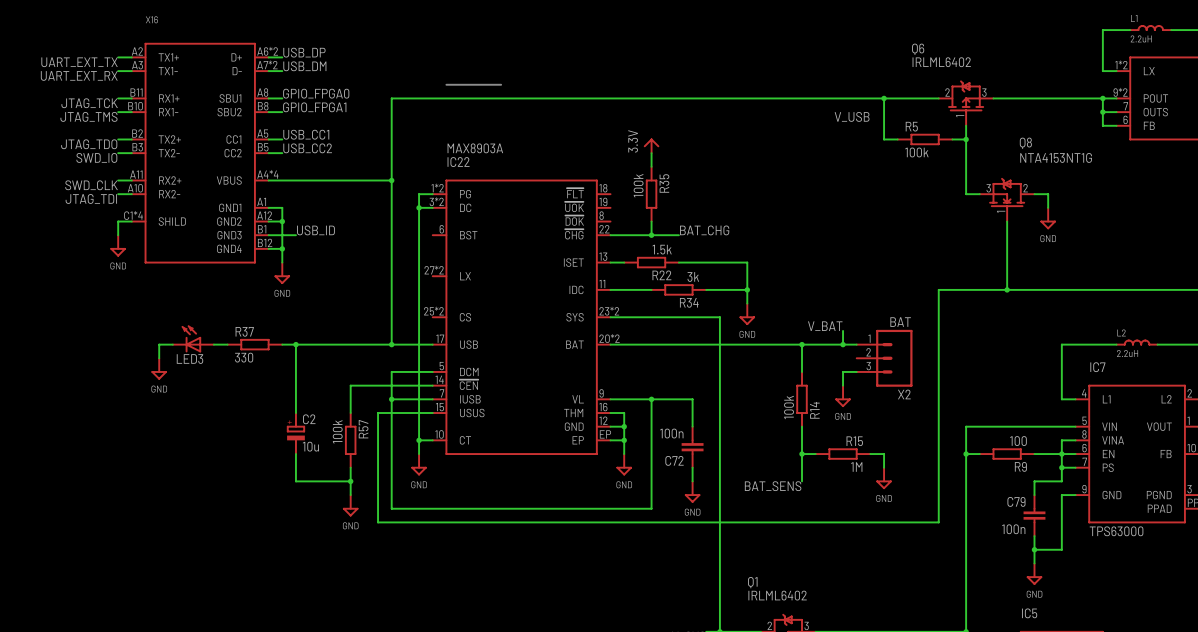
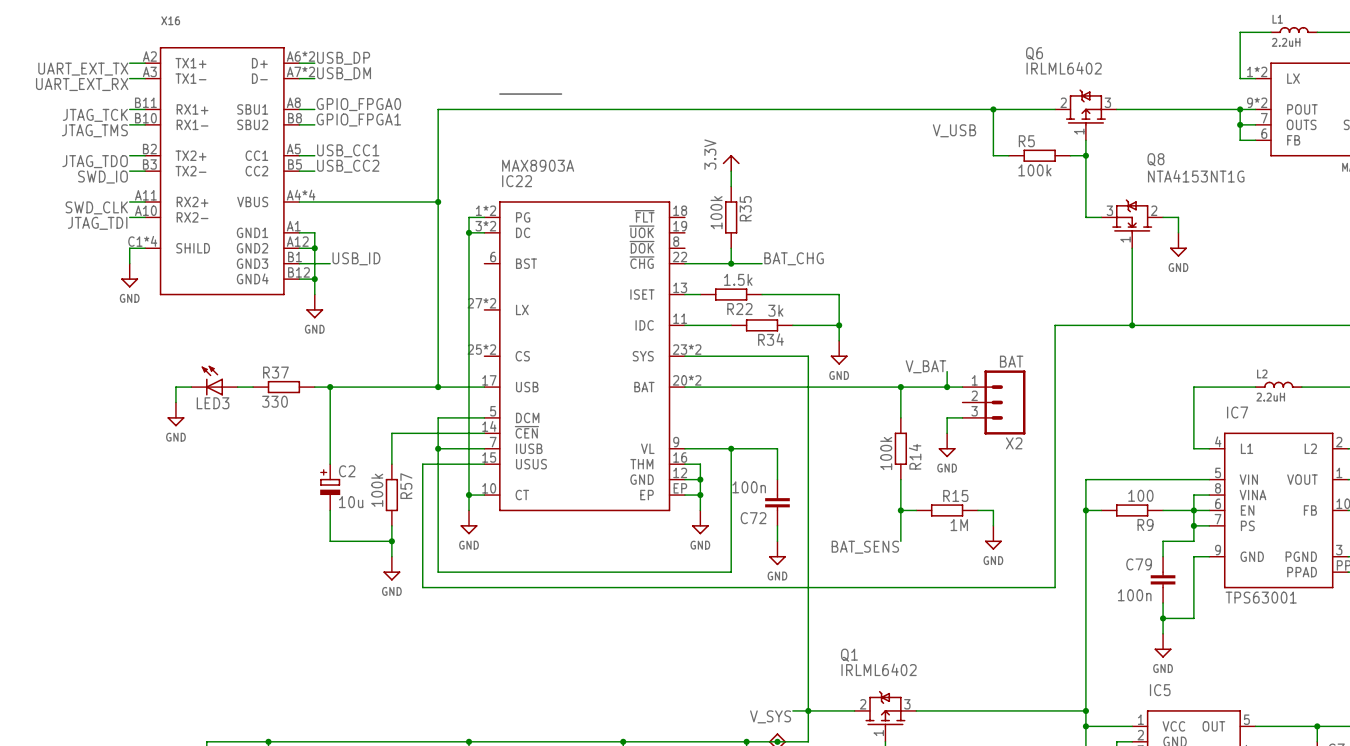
IC7 value: TPS63000 (1116, 531) -> TPS63001 (1261, 597)

